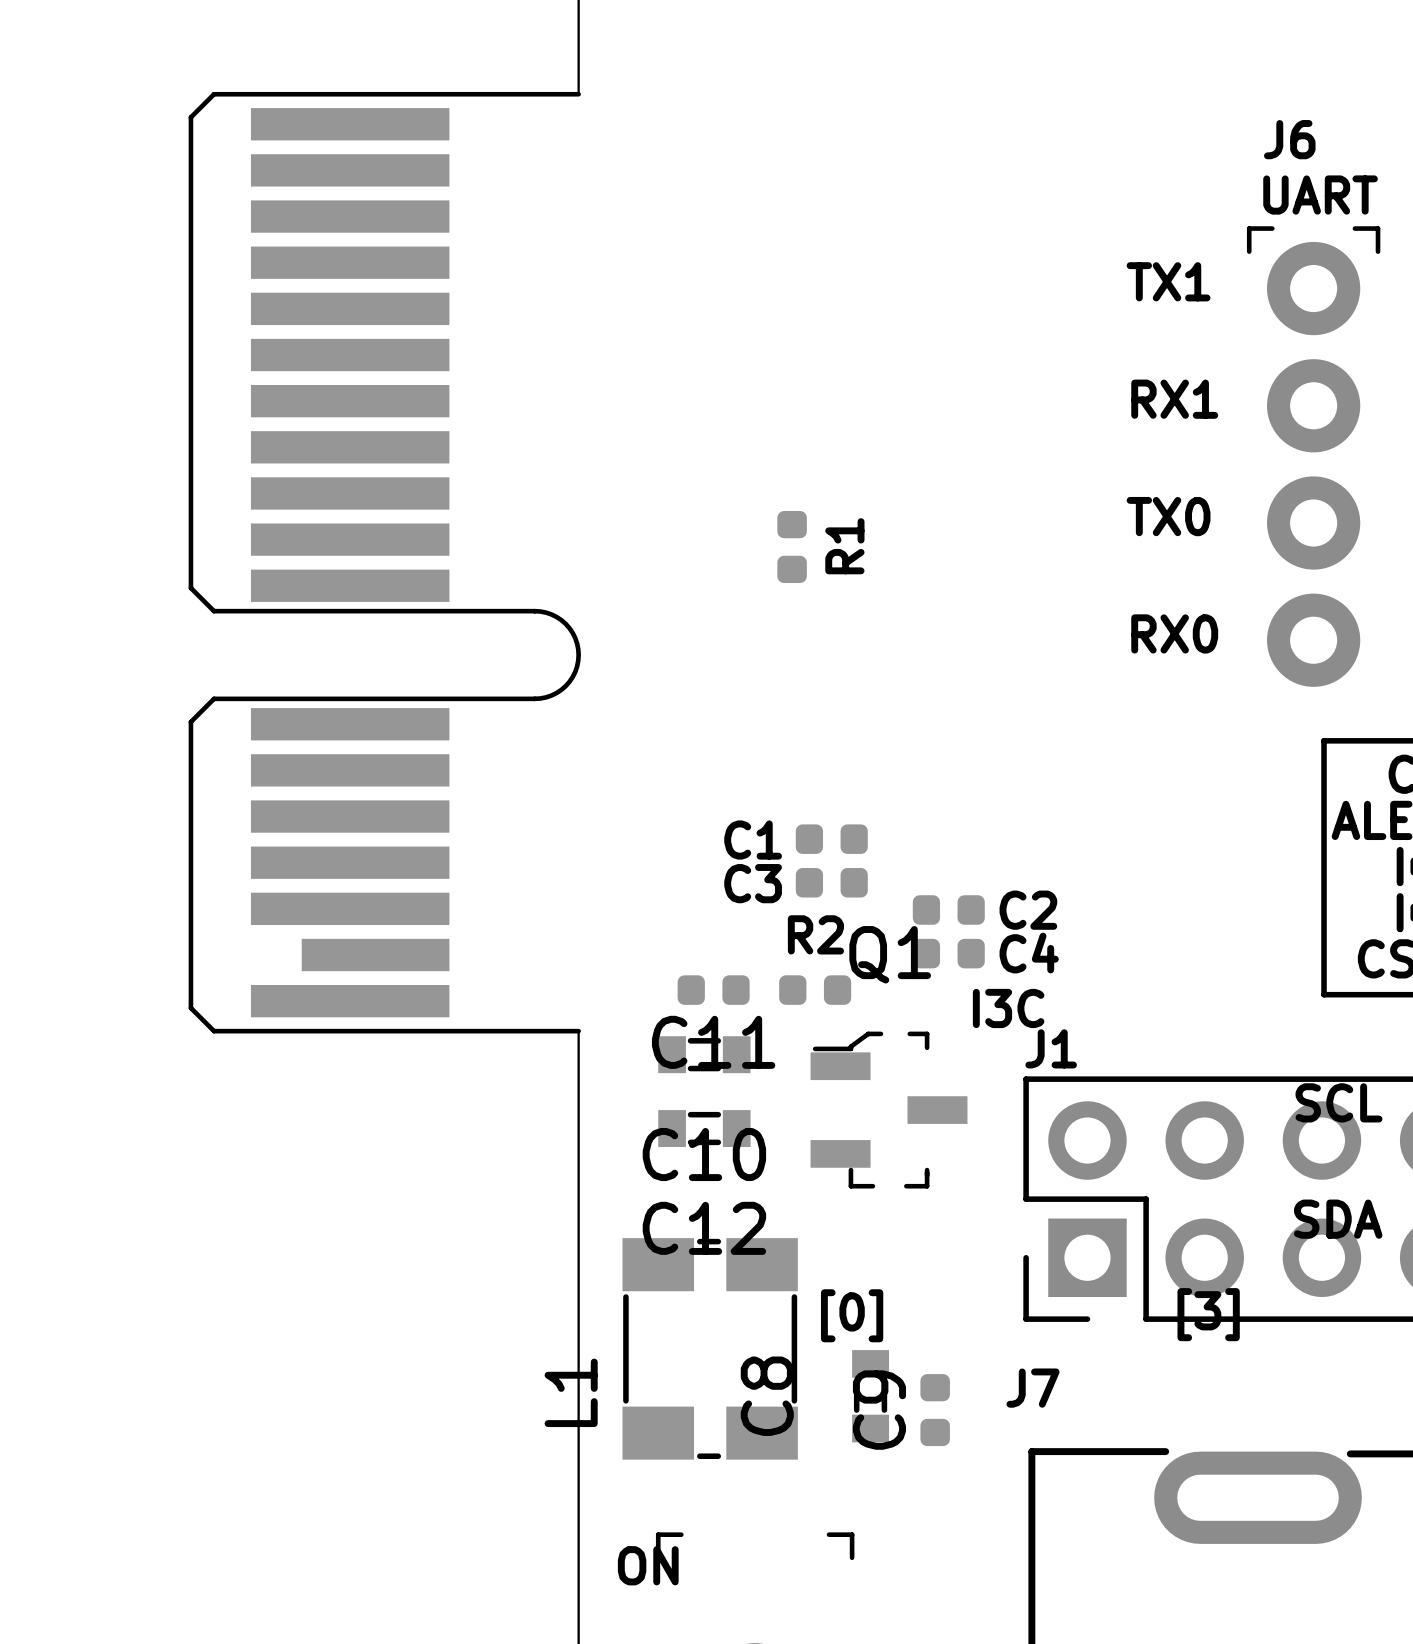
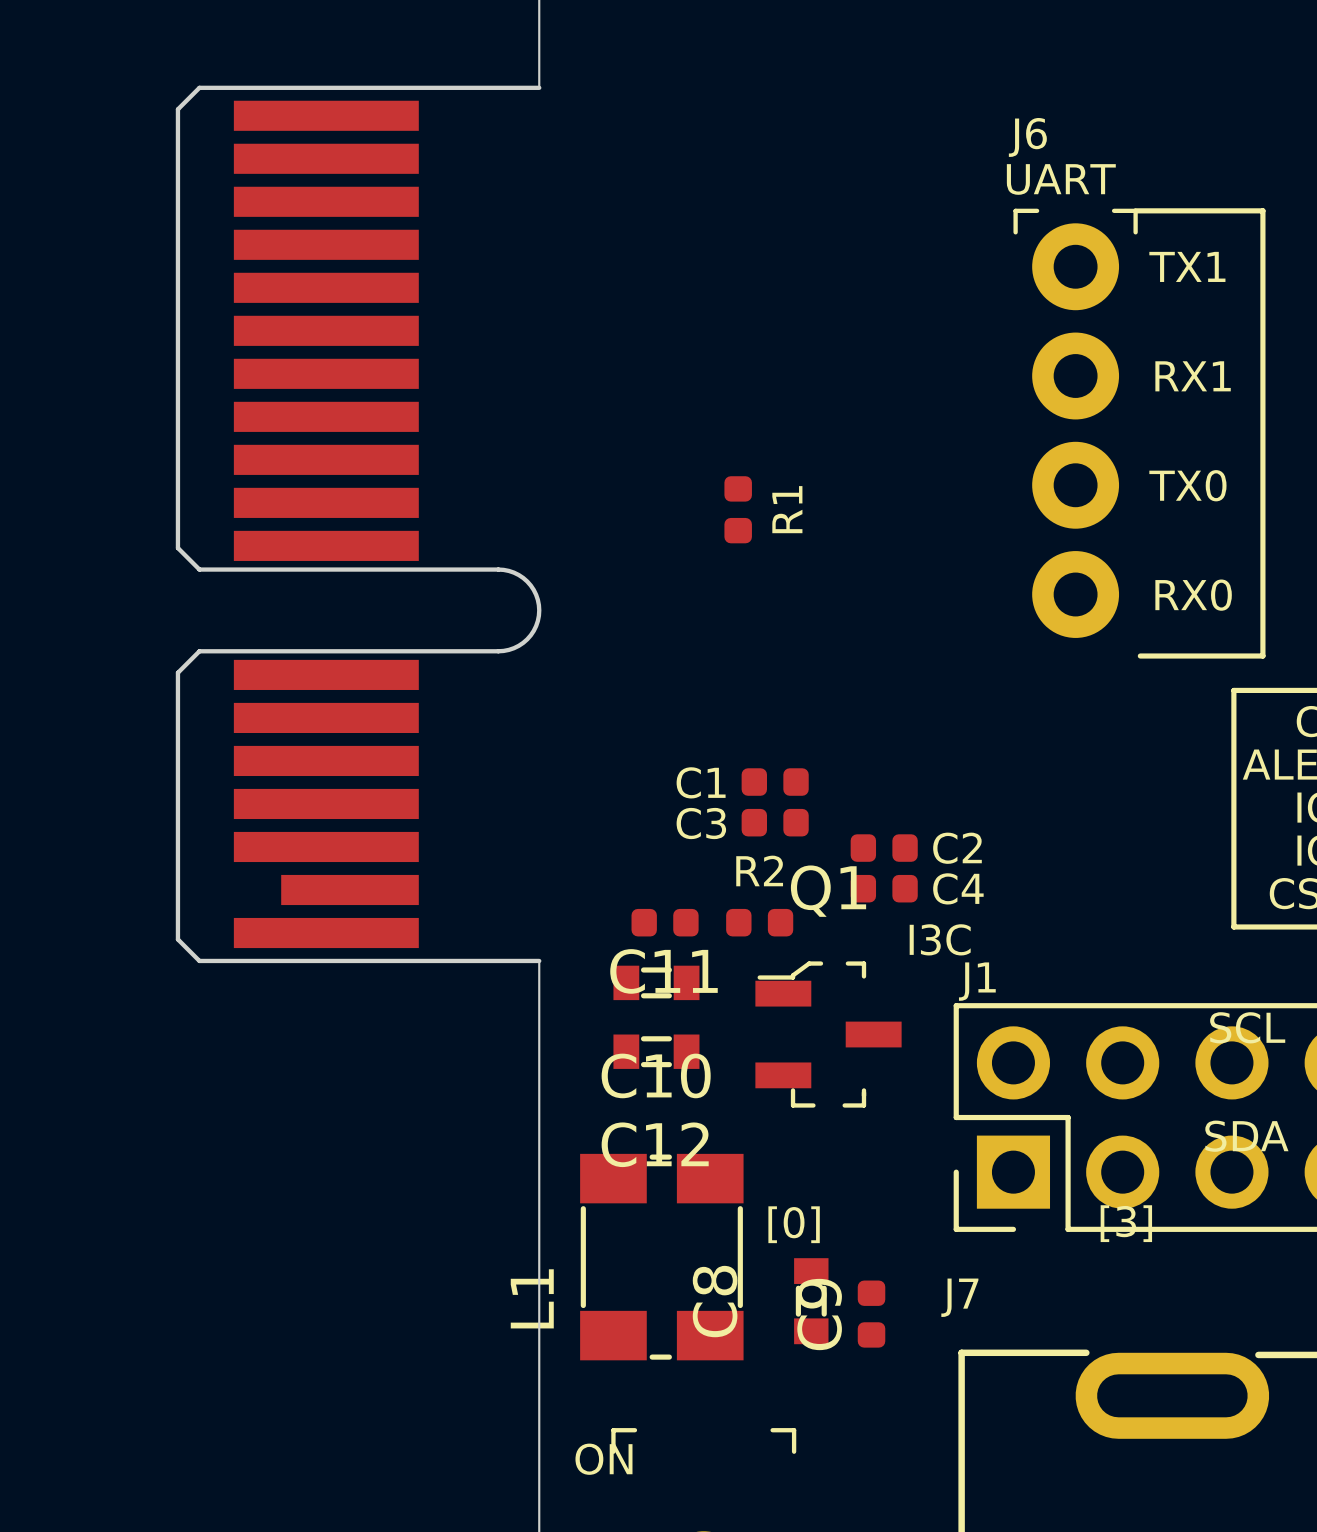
J6 name position: J6 (1289, 139) -> J6 (1027, 137)
text position: UART (1320, 195) -> UART (1061, 179)
line: none -> (1135, 210) (1262, 210) (1262, 656) (1140, 656)
text position: TX1 (1168, 281) -> TX1 (1187, 266)
text position: RX1 (1174, 399) -> RX1 (1193, 376)
J6 position: (1313, 456) -> (1075, 423)
text position: TX0 (1168, 516) -> TX0 (1187, 485)
text position: RX0 (1174, 633) -> RX0 (1193, 595)

